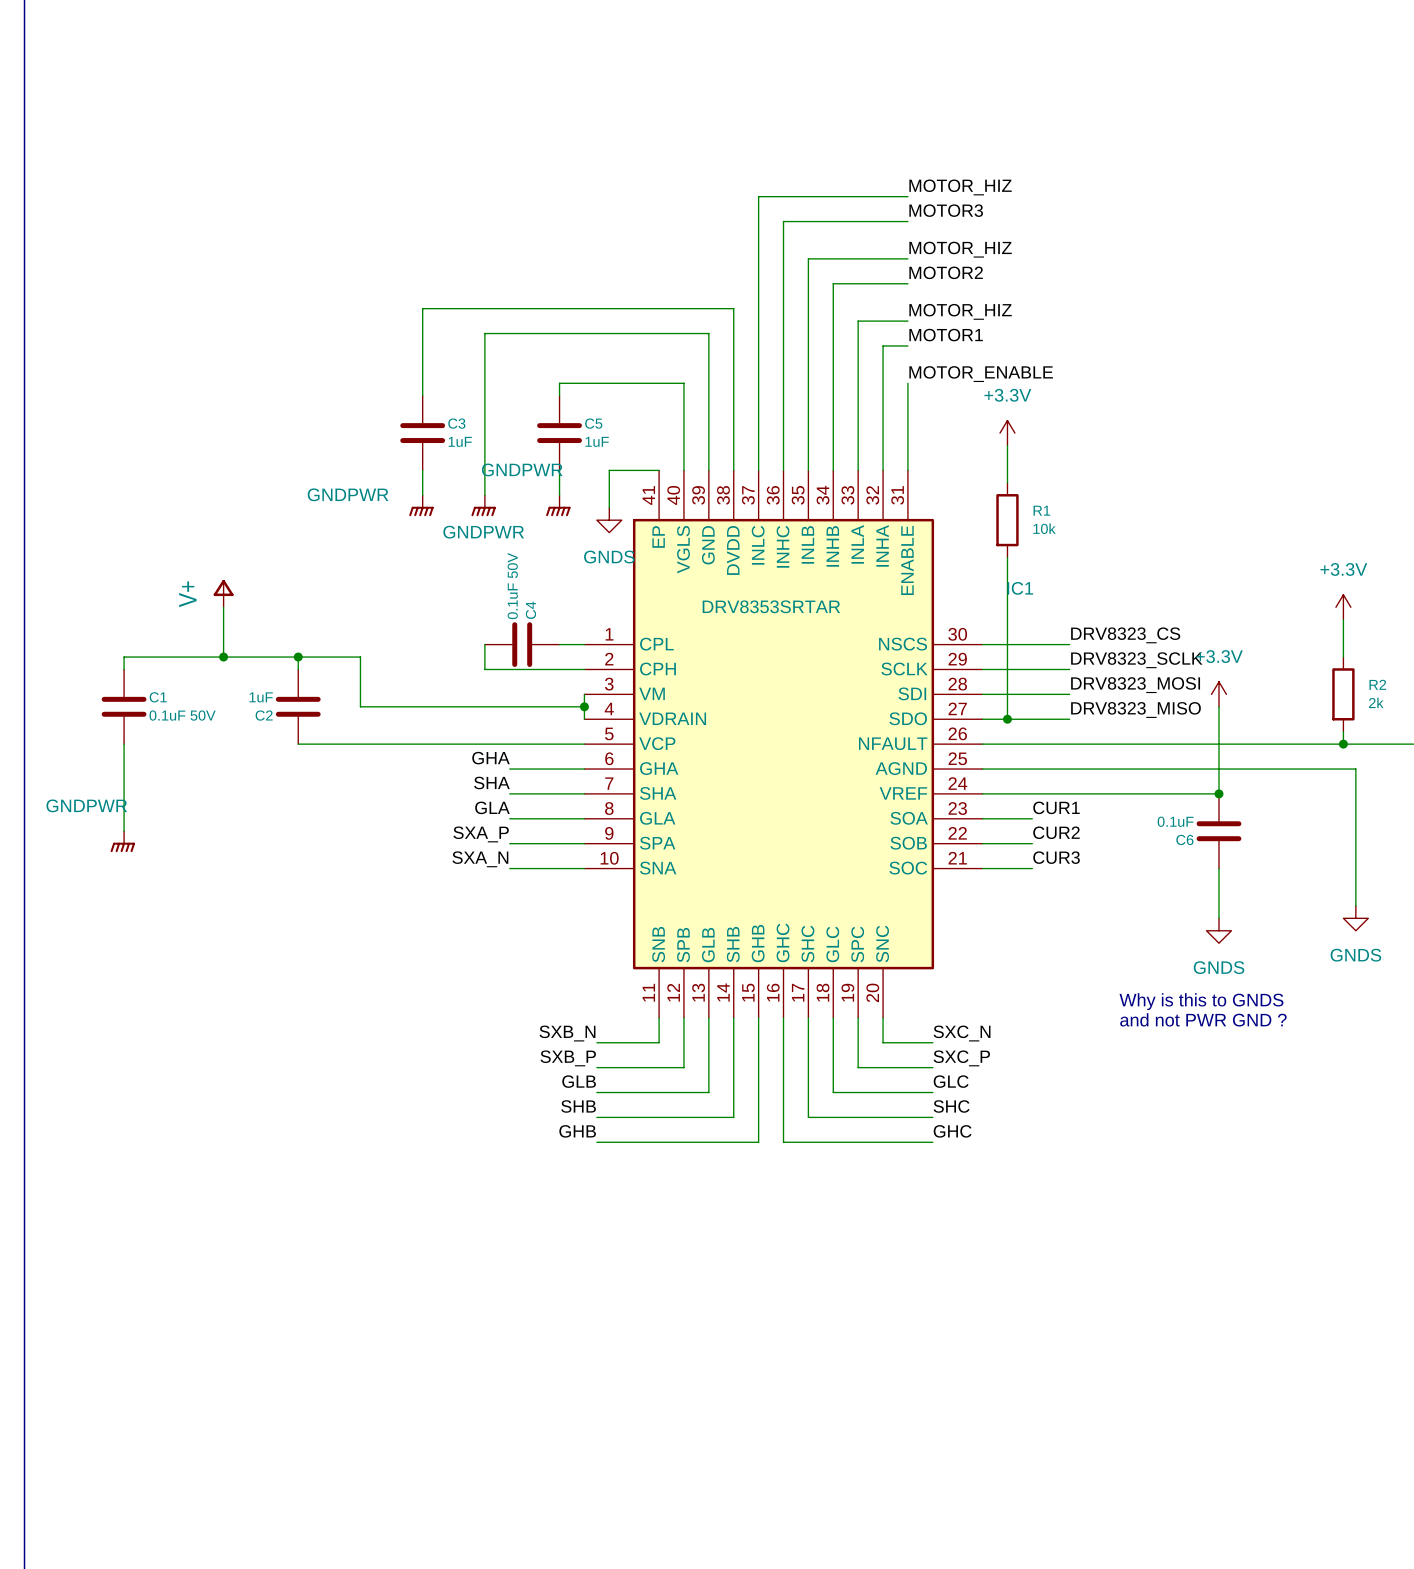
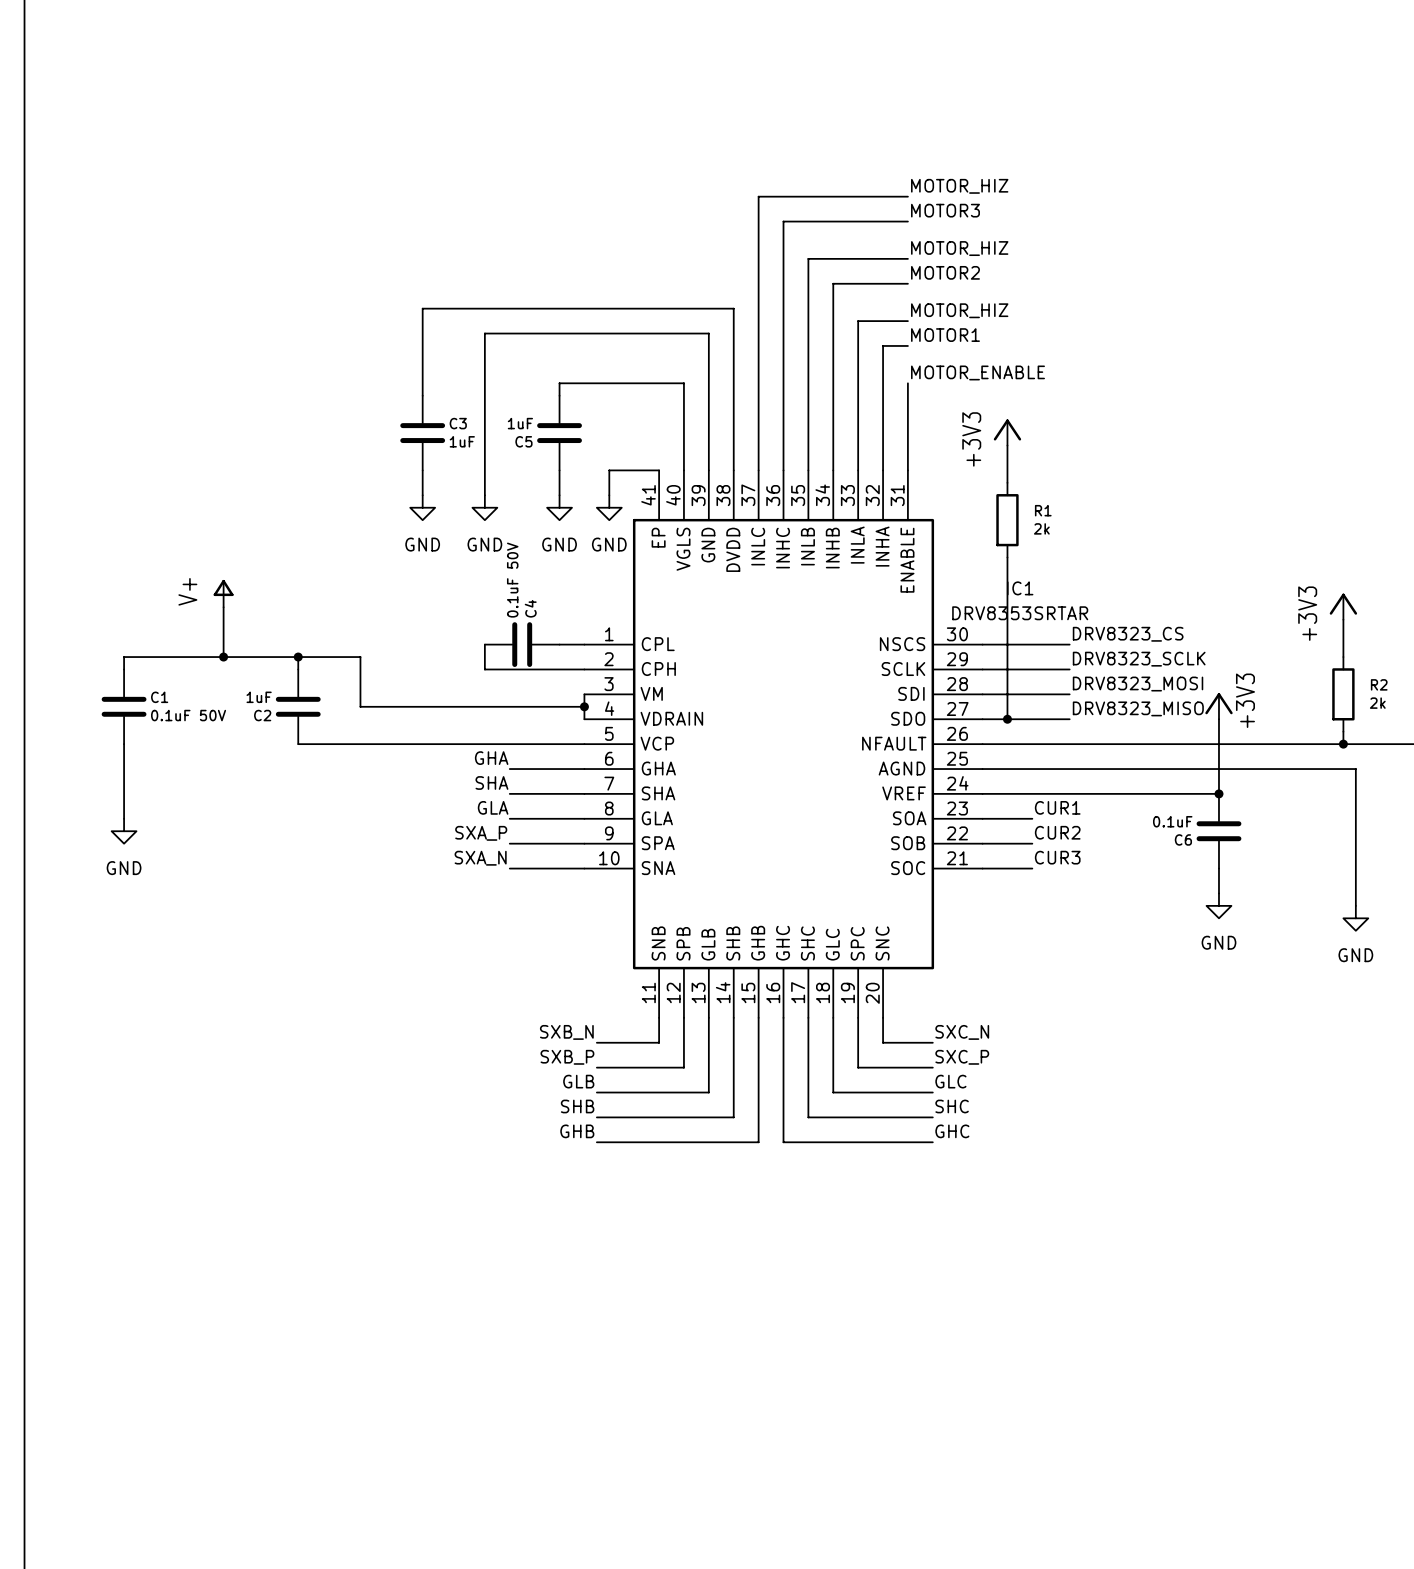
C5 name position: C5 (593, 423) -> C5 (523, 441)
power symbol: +3.3V (1007, 433) -> +3V3 (1007, 432)
C5 value position: 1uF (597, 441) -> 1uF (520, 423)
power symbol: GNDPWR (421, 505) -> GND (422, 507)
power symbol: GNDPWR (483, 505) -> GND (484, 507)
power symbol: GNDPWR (558, 505) -> GND (559, 507)
power symbol: none -> GND (609, 507)
power symbol: GNDS (609, 520) -> none
R1 value: 10k (1044, 528) -> 2k (1041, 528)
IC1 value position: DRV8353SRTAR (771, 606) -> DRV8353SRTAR (1020, 613)
power symbol: +3.3V (1343, 607) -> +3V3 (1343, 606)
power symbol: +3.3V (1218, 694) -> none
power symbol: none -> +3V3 (1218, 706)
power symbol: none -> GND (124, 831)
power symbol: GNDPWR (122, 841) -> none
power symbol: none -> GND (1218, 905)
power symbol: GNDS (1355, 918) -> GND (1355, 918)
power symbol: GNDS (1218, 930) -> none
text: Why is this to GNDS (1201, 1001) -> none
text: and not PWR GND ? (1203, 1019) -> none

